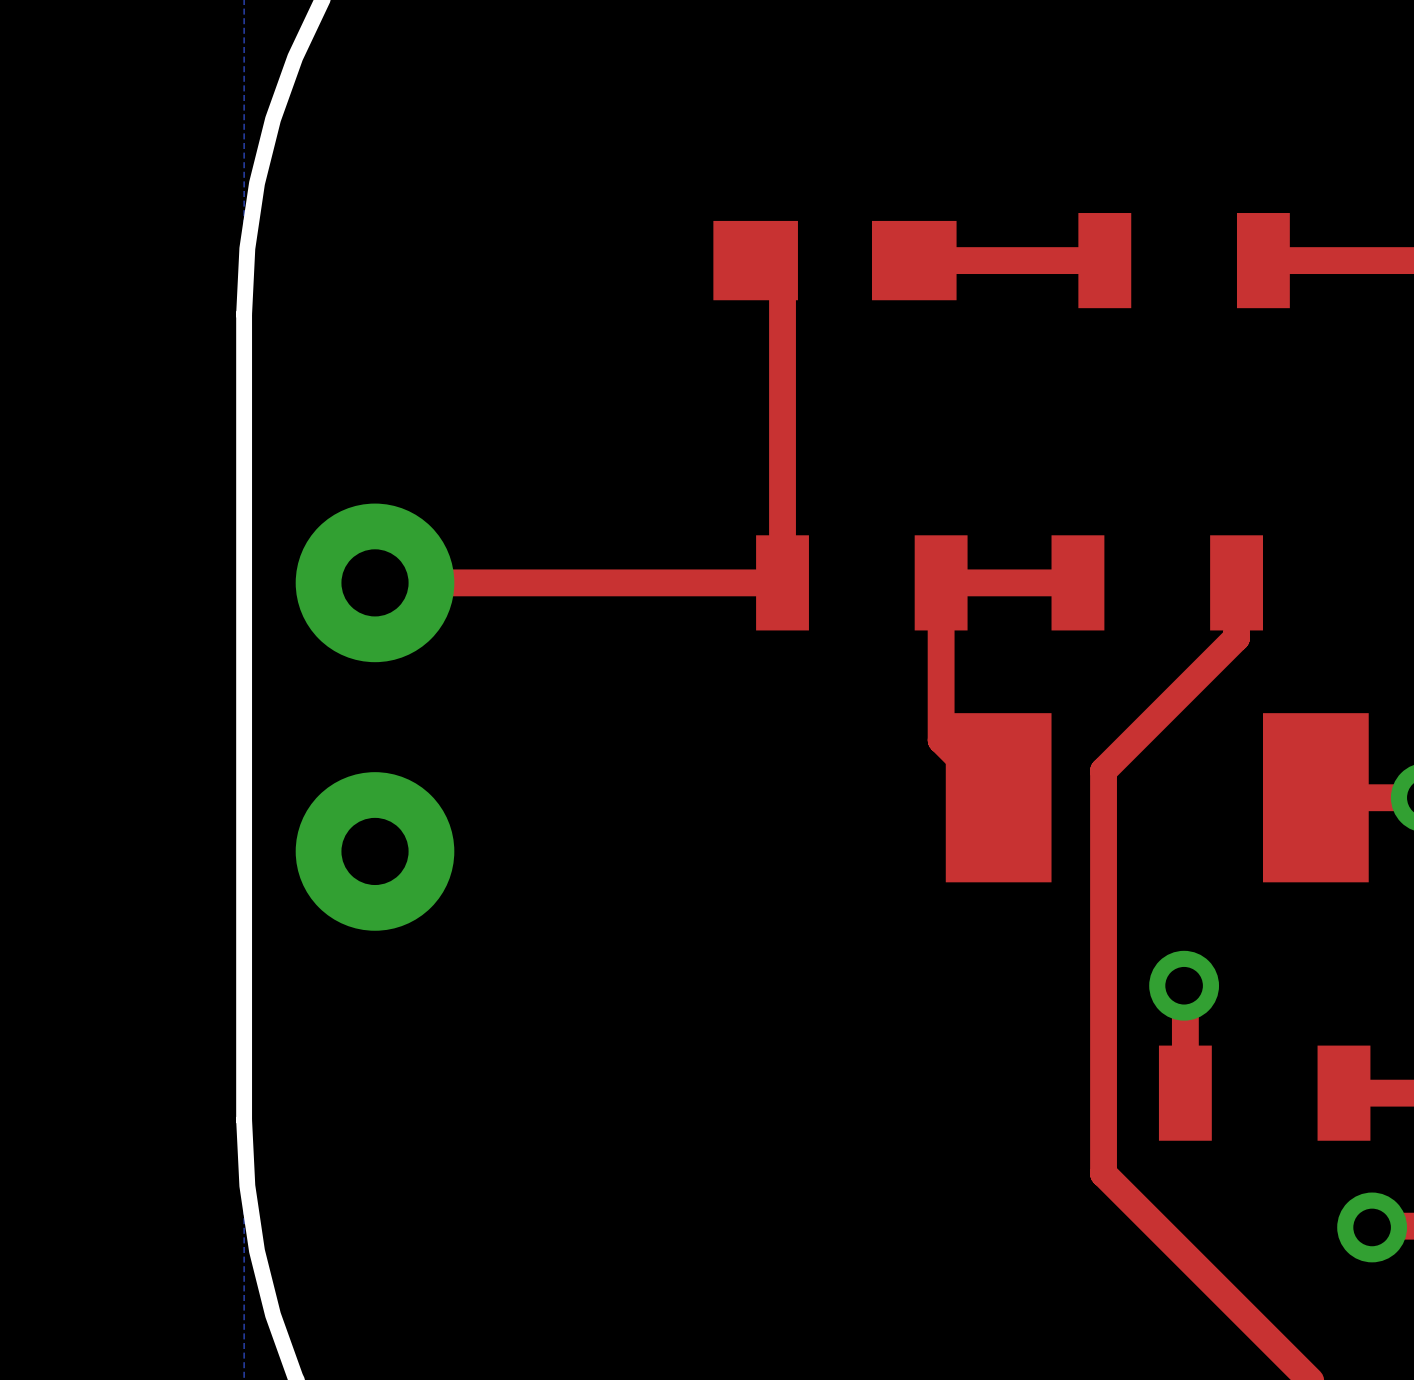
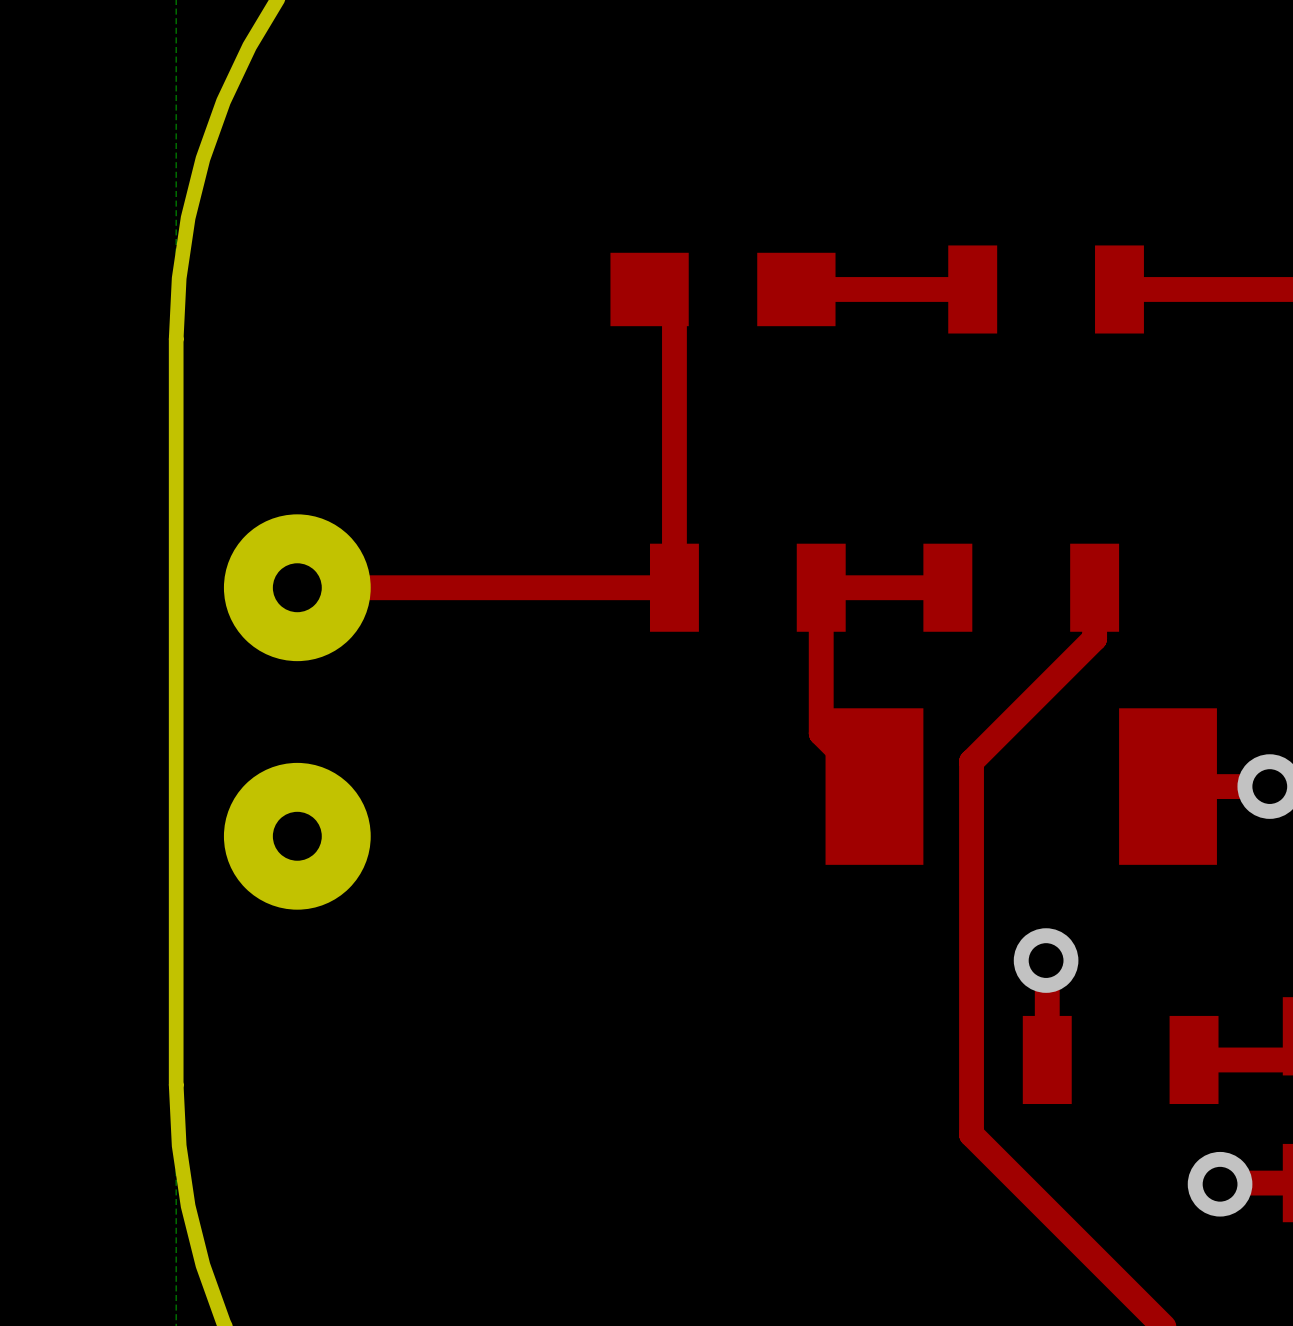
part footprint: [295, 503, 455, 931] -> [223, 514, 371, 910]

